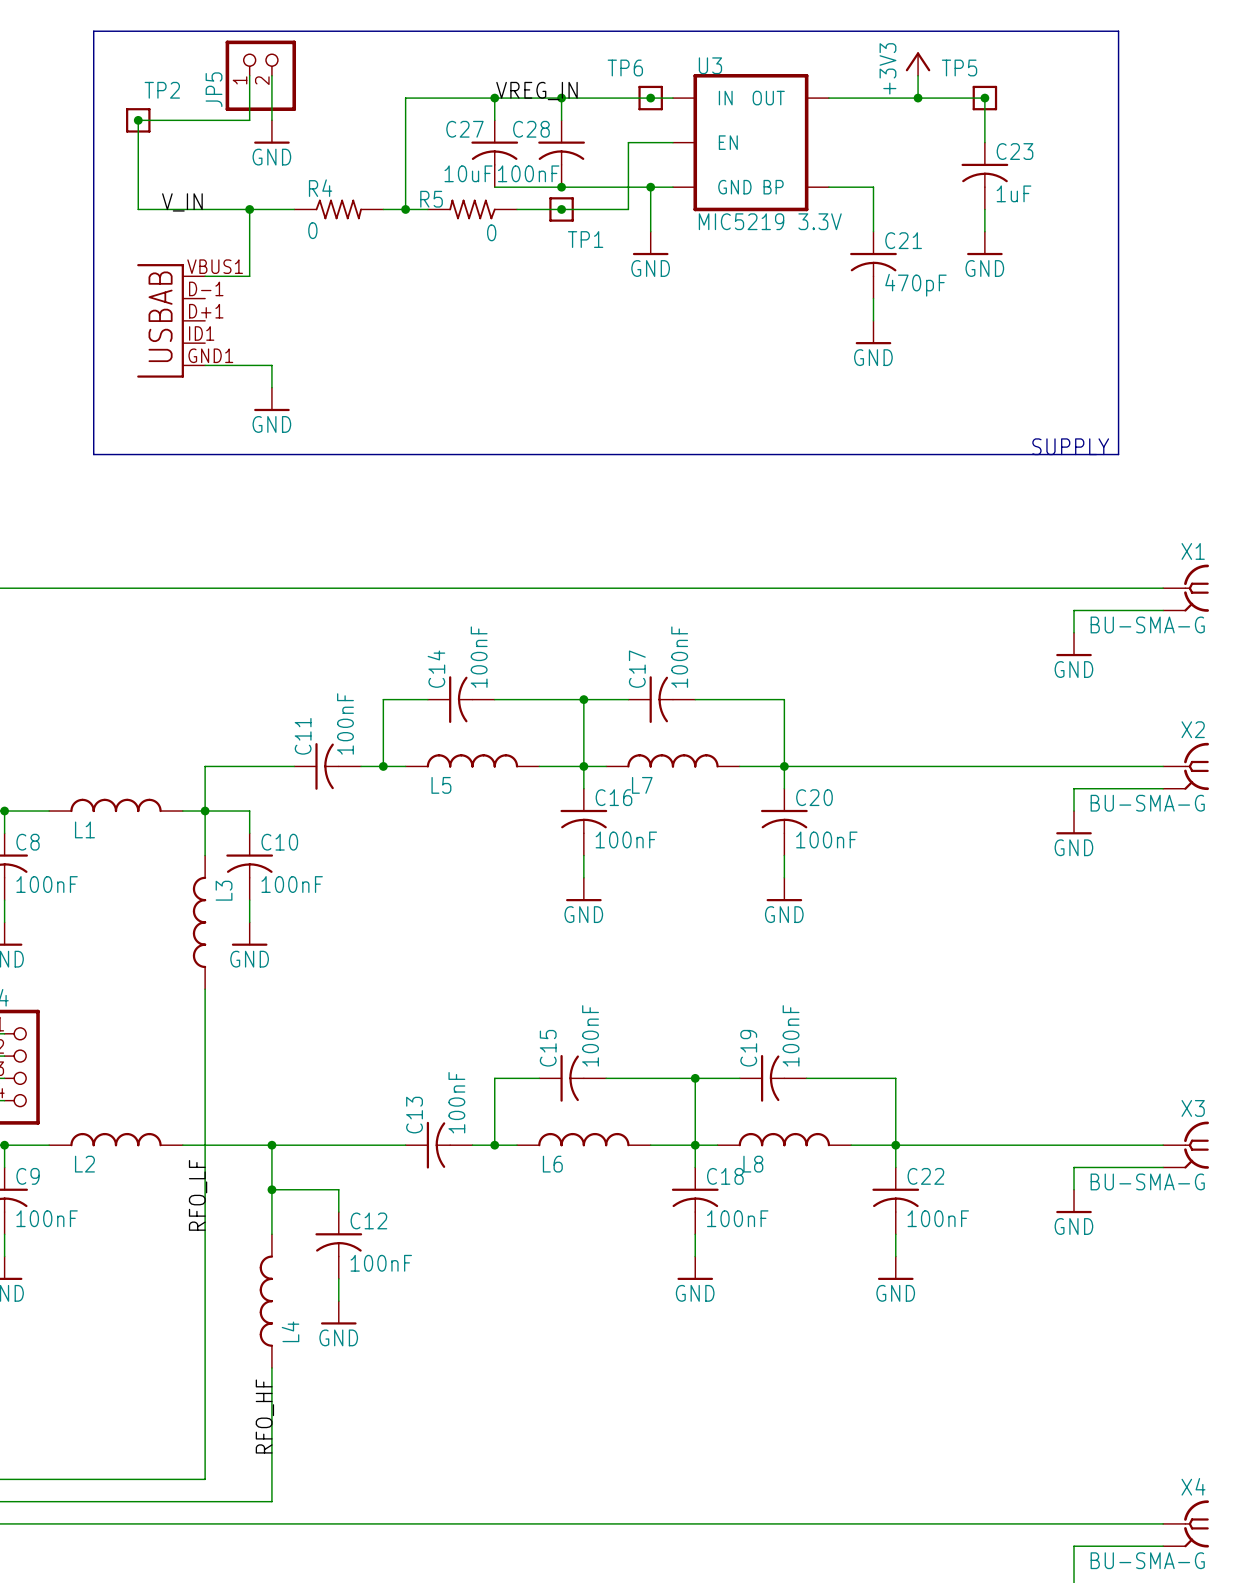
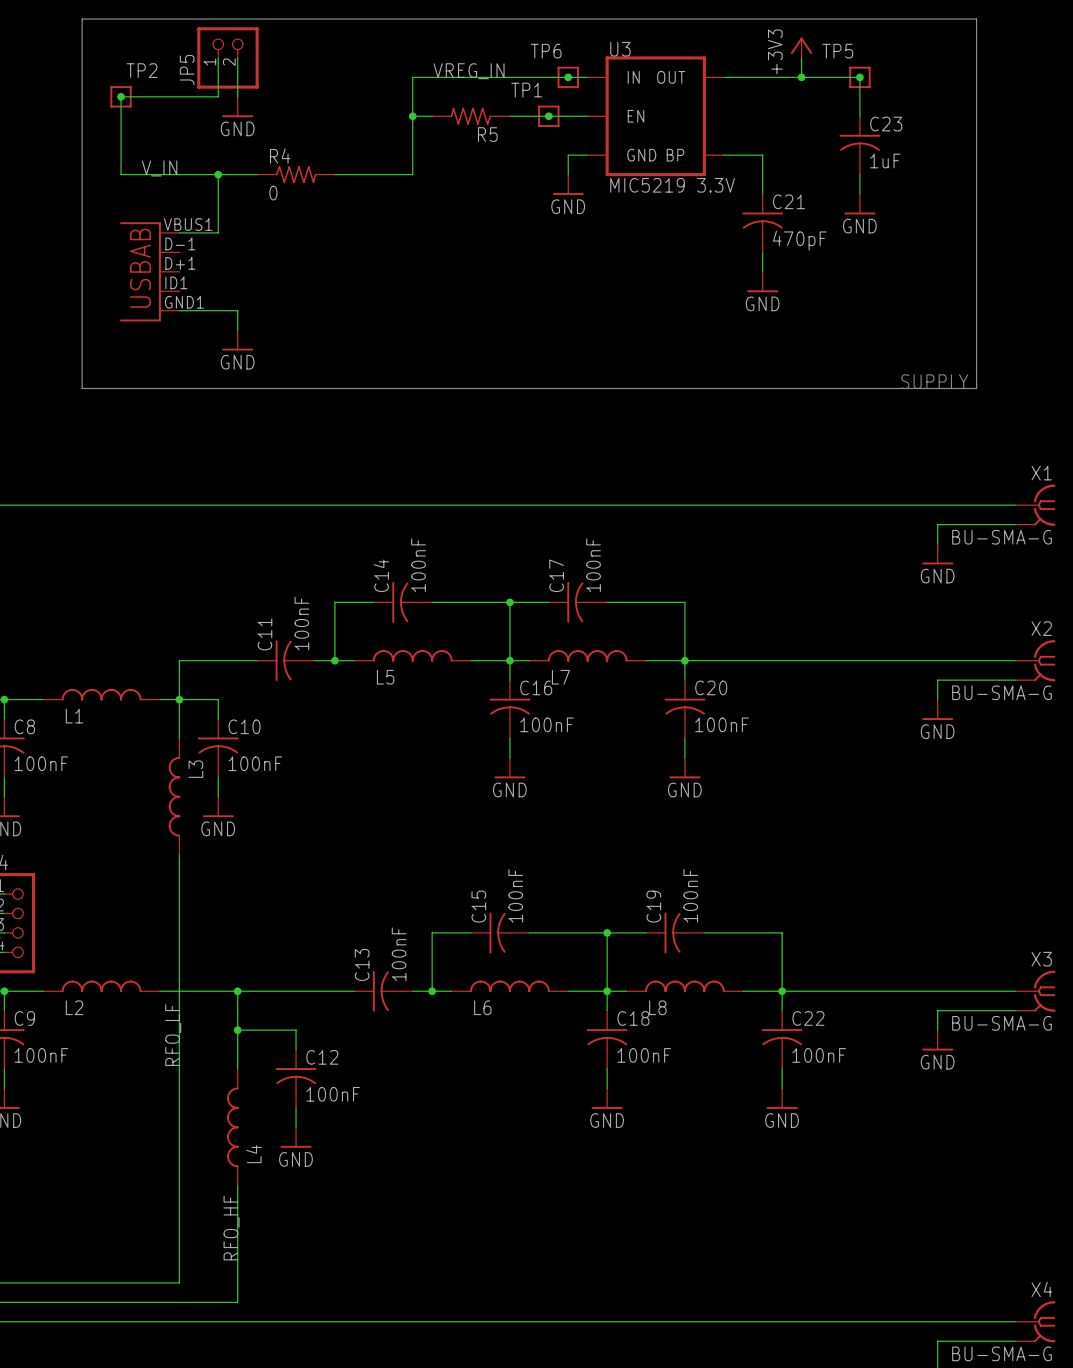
wire: (472, 98) (405, 98) (405, 209) -> (412, 77) (412, 174) (373, 174)
wire: (494, 98) (494, 120) -> none
junction: (494, 98) -> none
wire: (561, 98) (561, 120) -> none
junction: (561, 98) -> none
junction: none -> (412, 116)
wire: (628, 142) (628, 209) (517, 209) -> (548, 116) (509, 116)
junction: none -> (548, 116)
C27: 10uF (494, 153) -> none
C28: 100nF (561, 153) -> none
wire: (494, 187) (650, 187) -> none
junction: (561, 187) -> none
junction: (650, 187) -> none
R5 name position: R5 (431, 199) -> R5 (487, 134)
junction: (405, 209) -> none
R5 position: (472, 209) -> (471, 116)
TP1 position: (561, 209) -> (548, 116)
junction: (561, 209) -> none
R5 value: 0 (491, 232) -> none
TP1 name position: TP1 (585, 239) -> TP1 (526, 90)
power symbol position: GND (650, 243) -> GND (568, 184)

